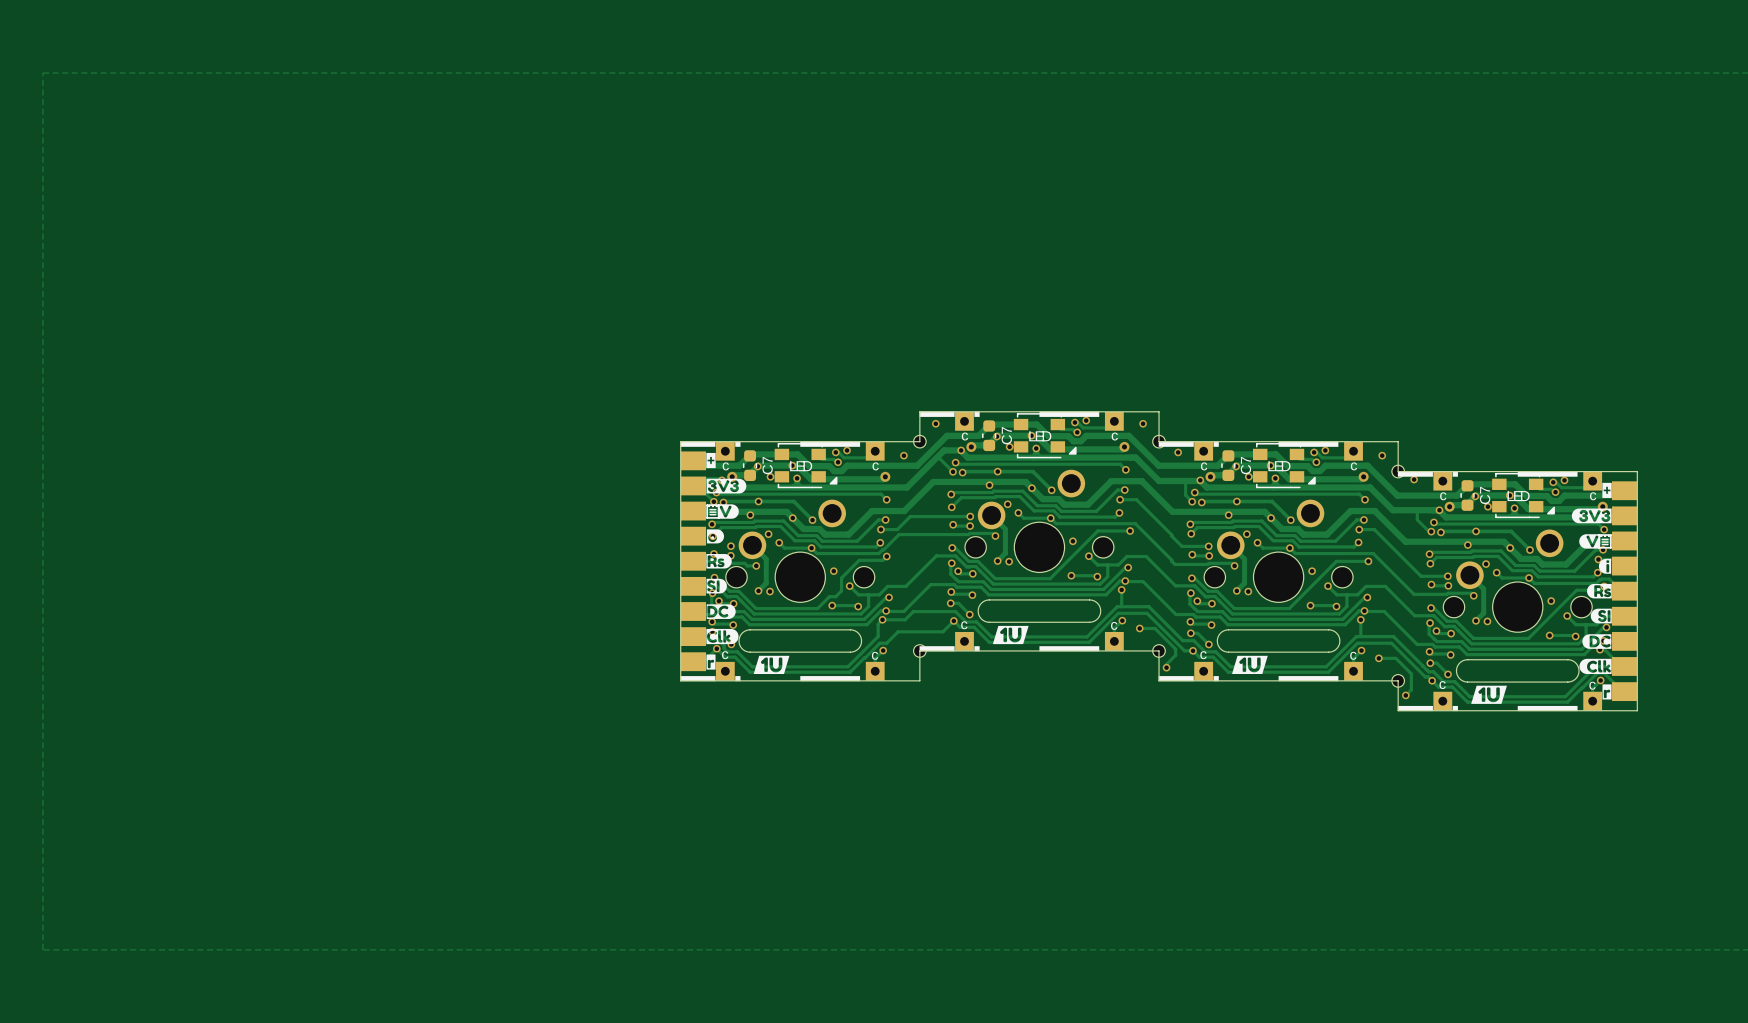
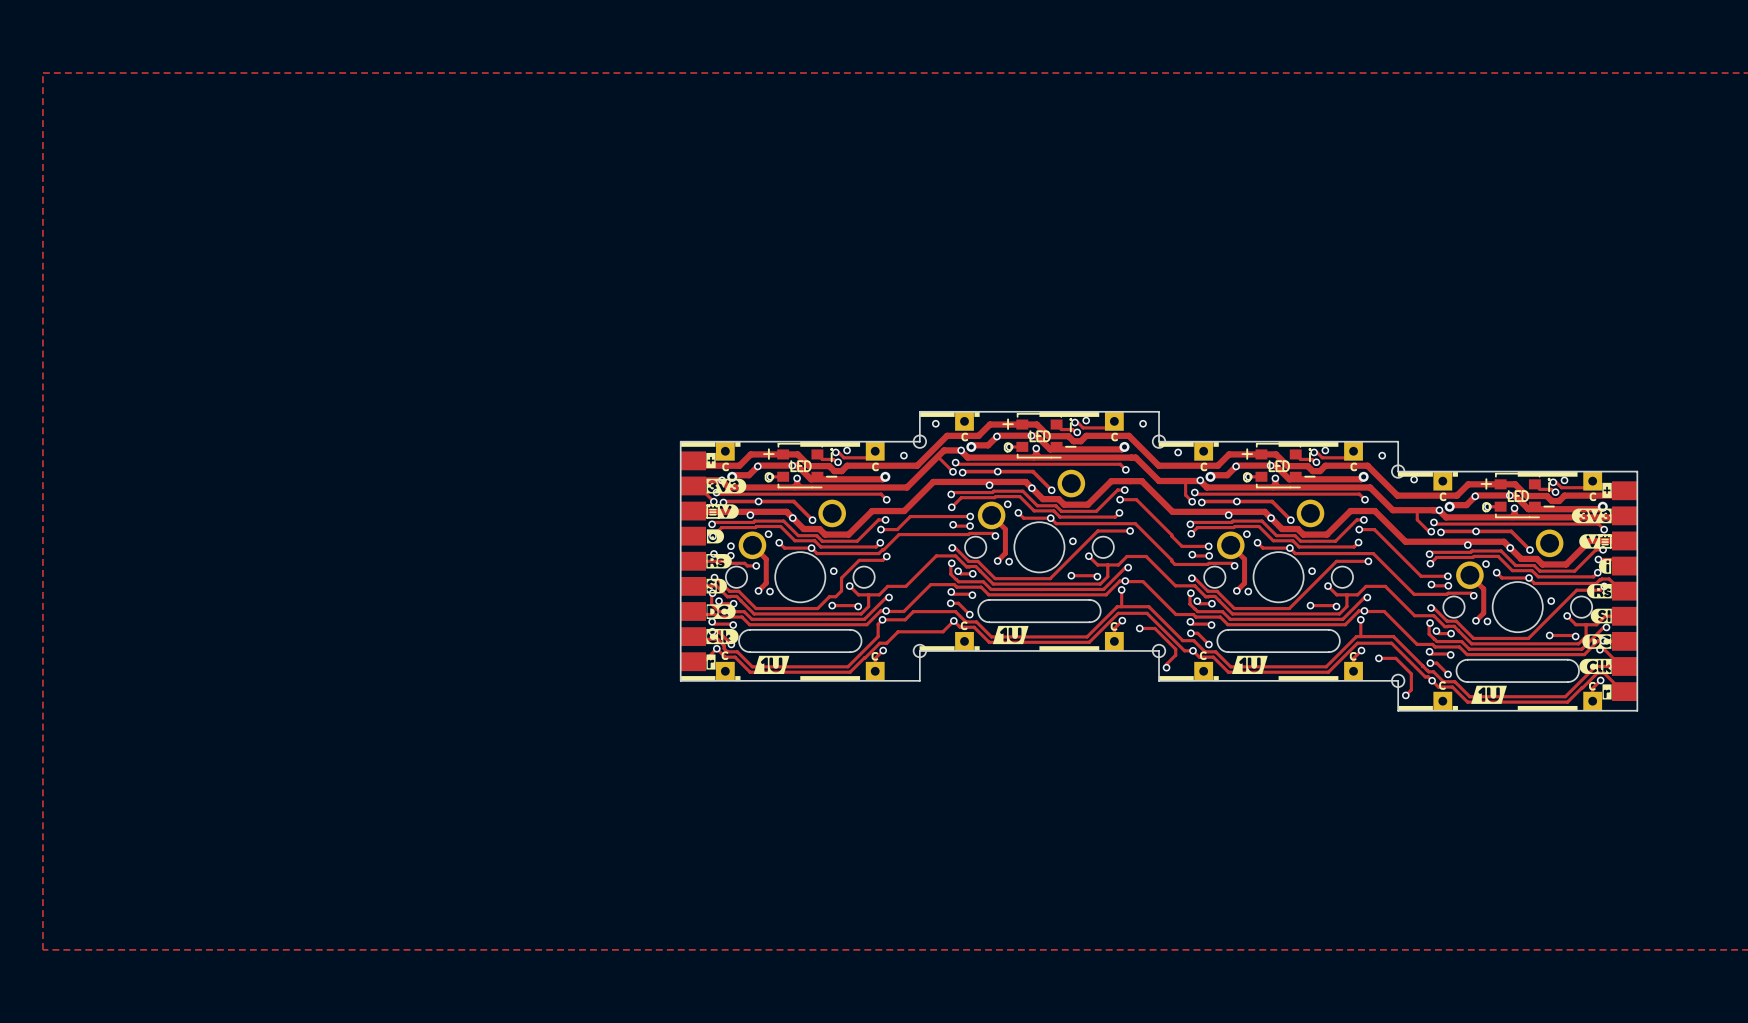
part footprint: [1013, 413, 1077, 459] -> [1016, 413, 1063, 459]
C7: (989, 435) -> none
part footprint: [774, 443, 838, 489] -> [777, 443, 824, 489]
part footprint: [1252, 443, 1316, 489] -> [1255, 443, 1302, 489]
C7: (750, 465) -> none
C7: (1228, 465) -> none
part footprint: [1492, 472, 1555, 519] -> [1494, 472, 1541, 519]
C7: (1467, 495) -> none

